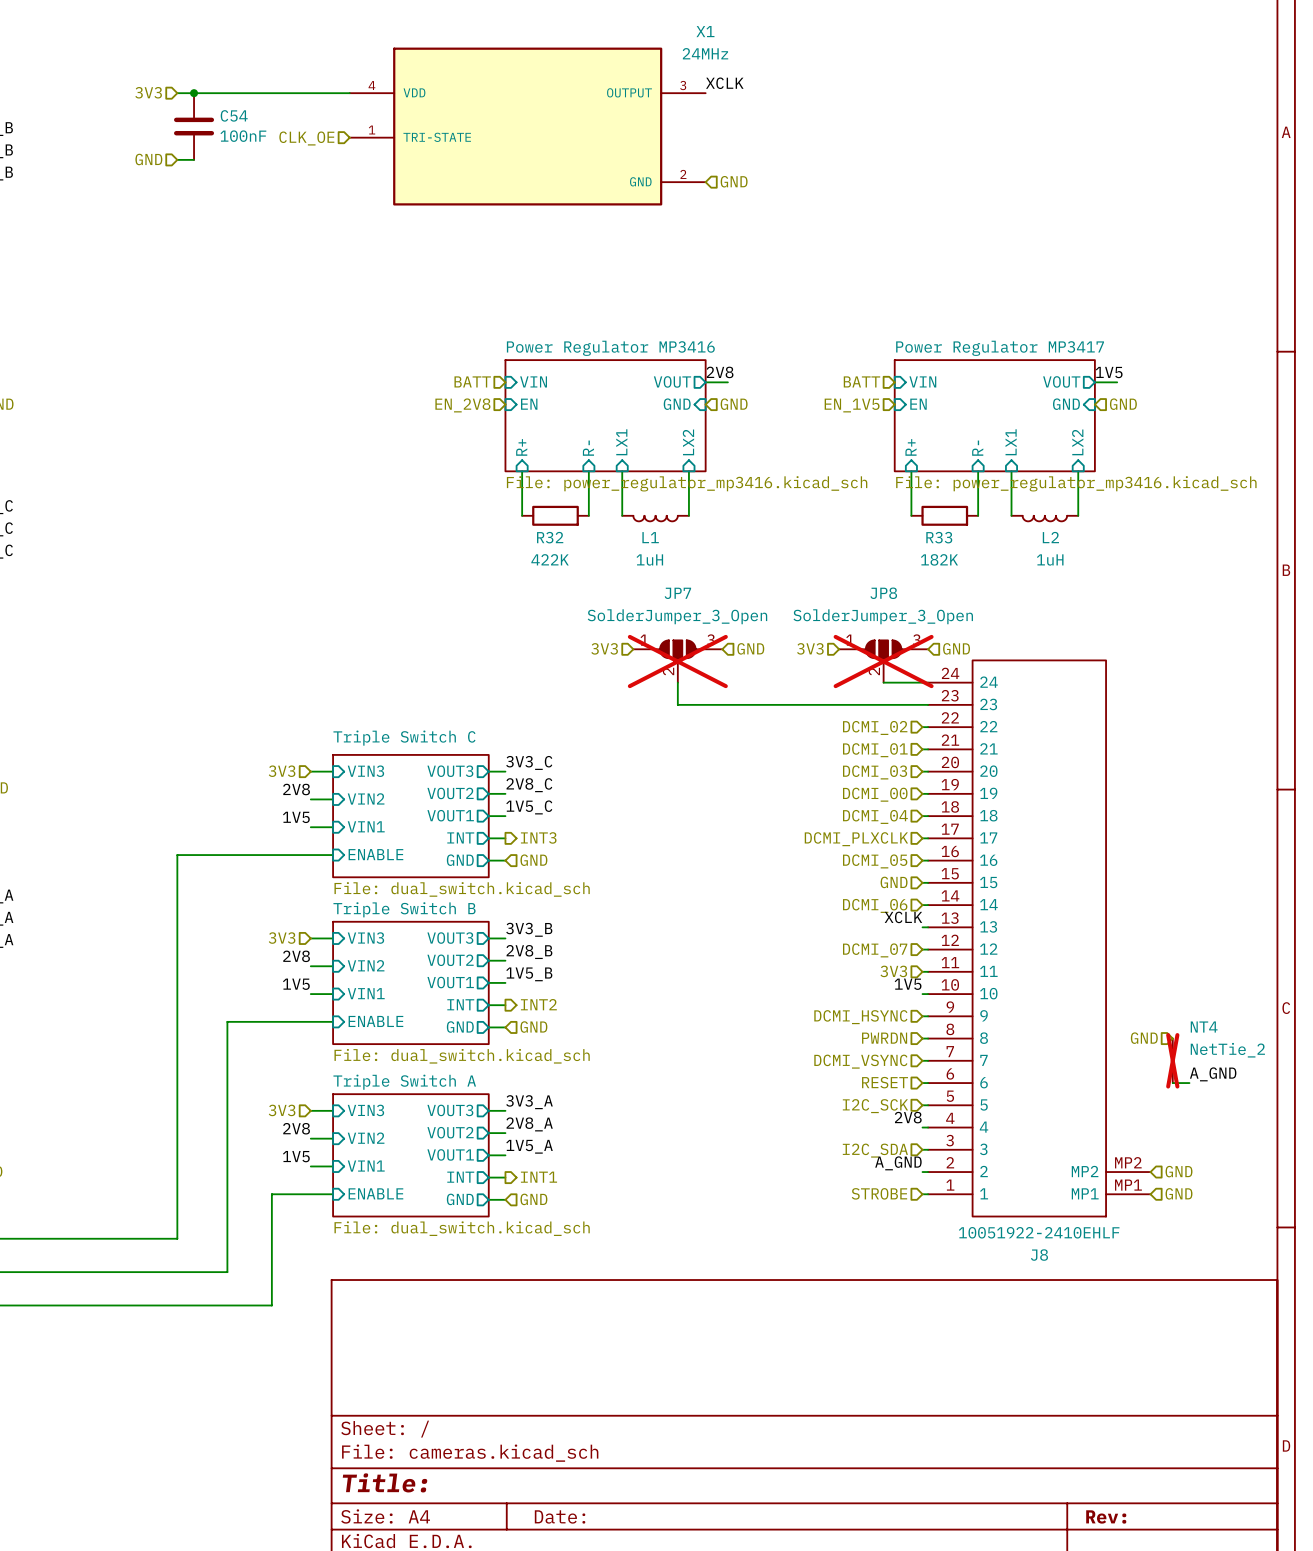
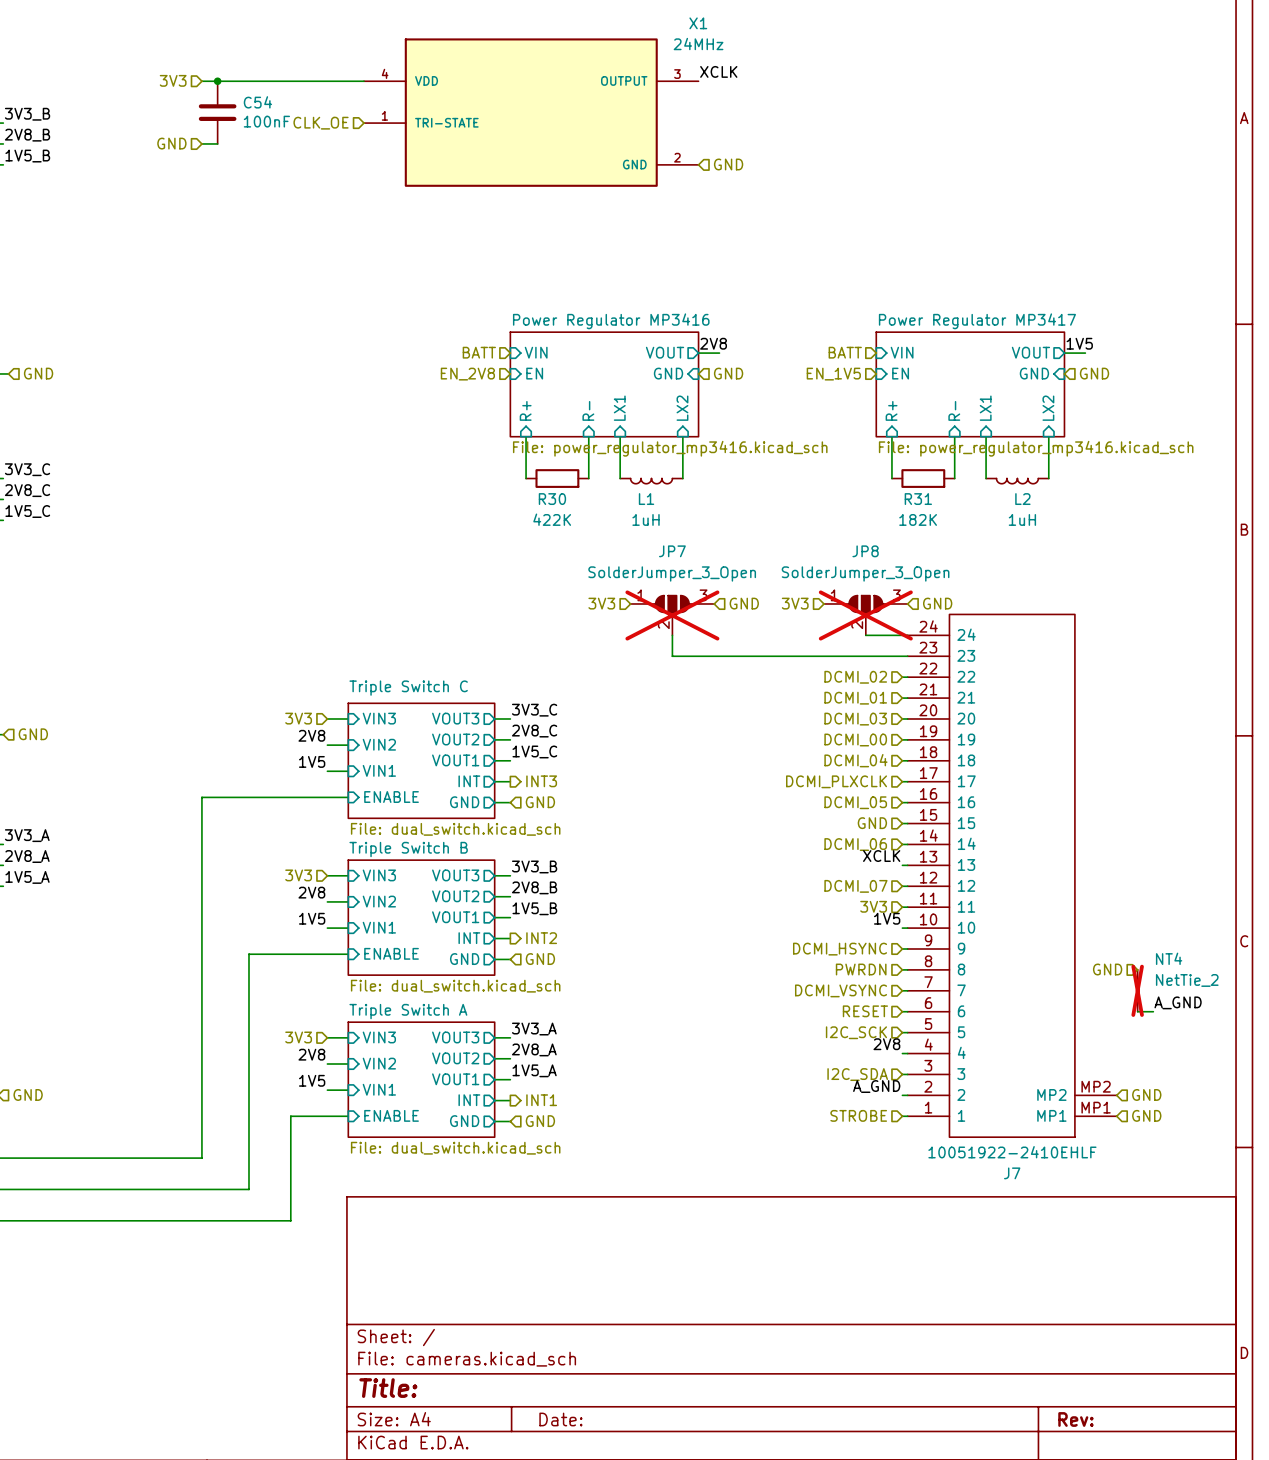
R32 name: R32 (550, 537) -> R30 (552, 499)
R33 name: R33 (939, 537) -> R31 (918, 499)
J8 name: J8 (1039, 1255) -> J7 (1012, 1173)

